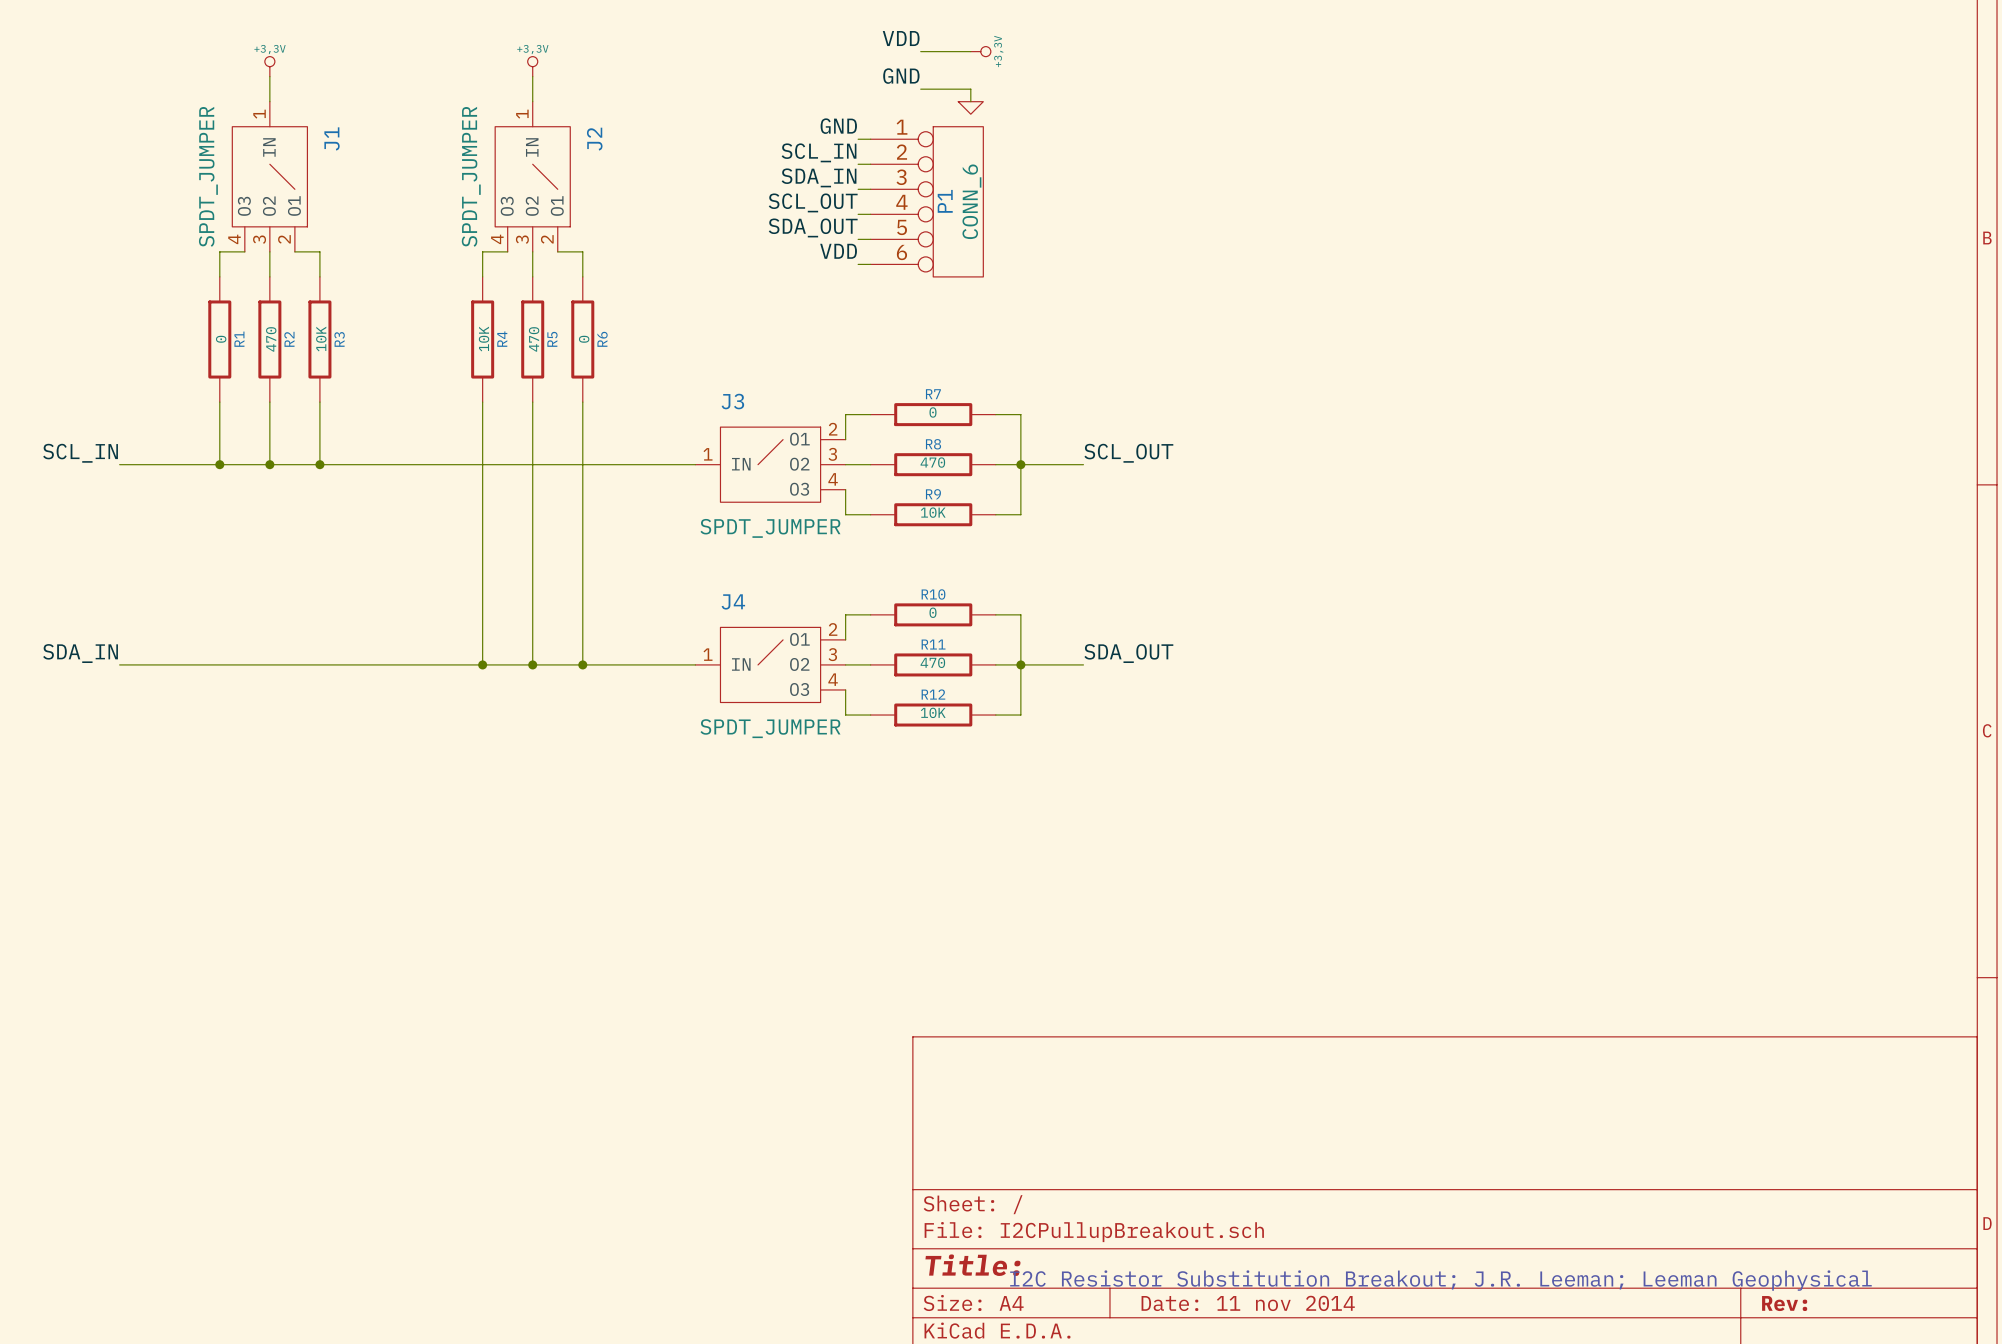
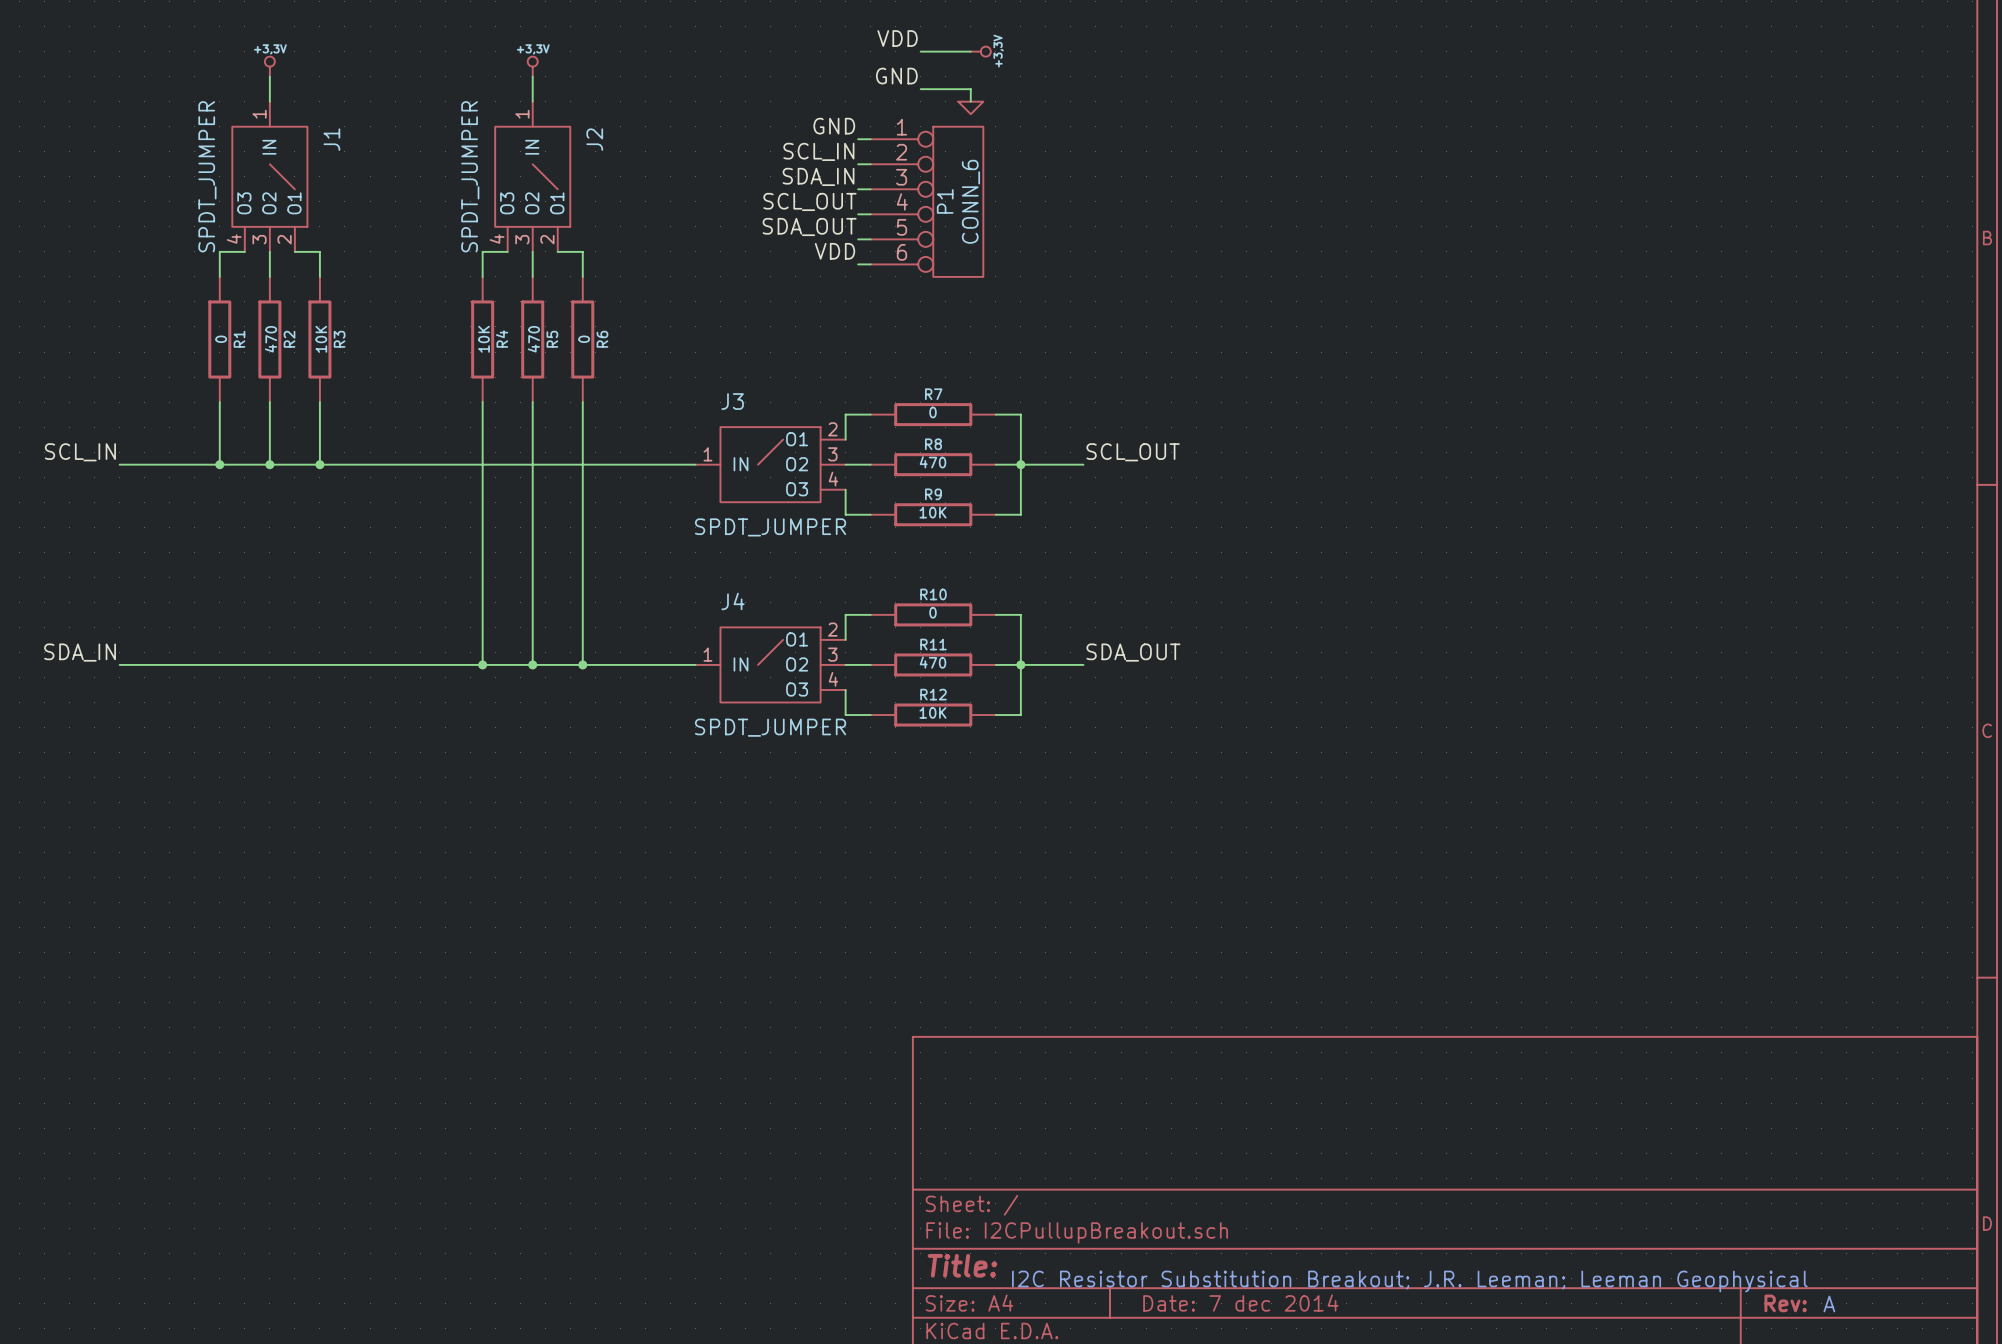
title block: Date: 11 nov 2014 (1248, 1303) -> Date: 7 dec 2014 (1240, 1303)
text: none -> A (1829, 1304)

